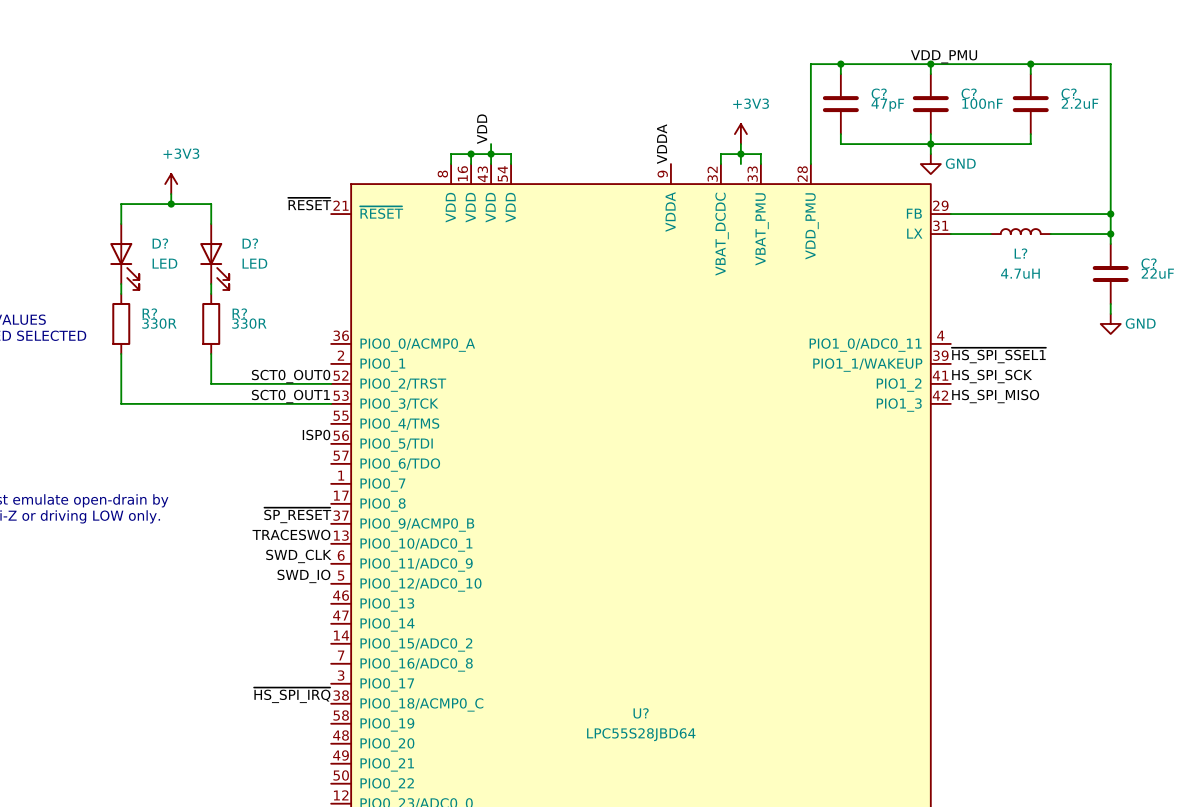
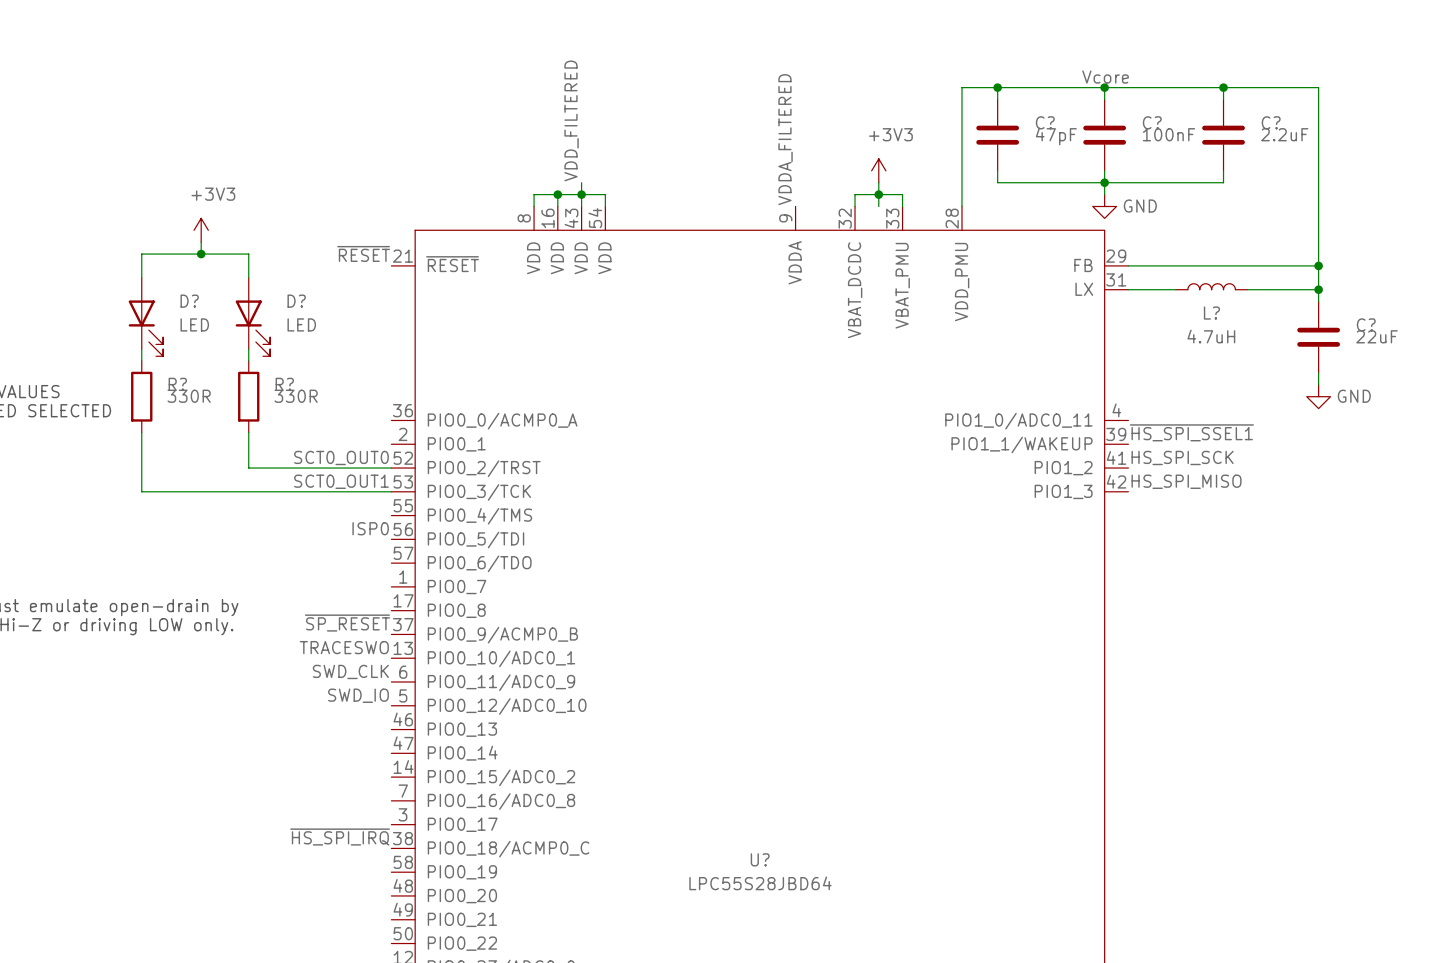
label: VDD_PMU (944, 56) -> Vcore (1105, 77)
label: VDD (482, 129) -> VDD_FILTERED (571, 120)
label: VDDA (662, 144) -> VDDA_FILTERED (785, 139)

